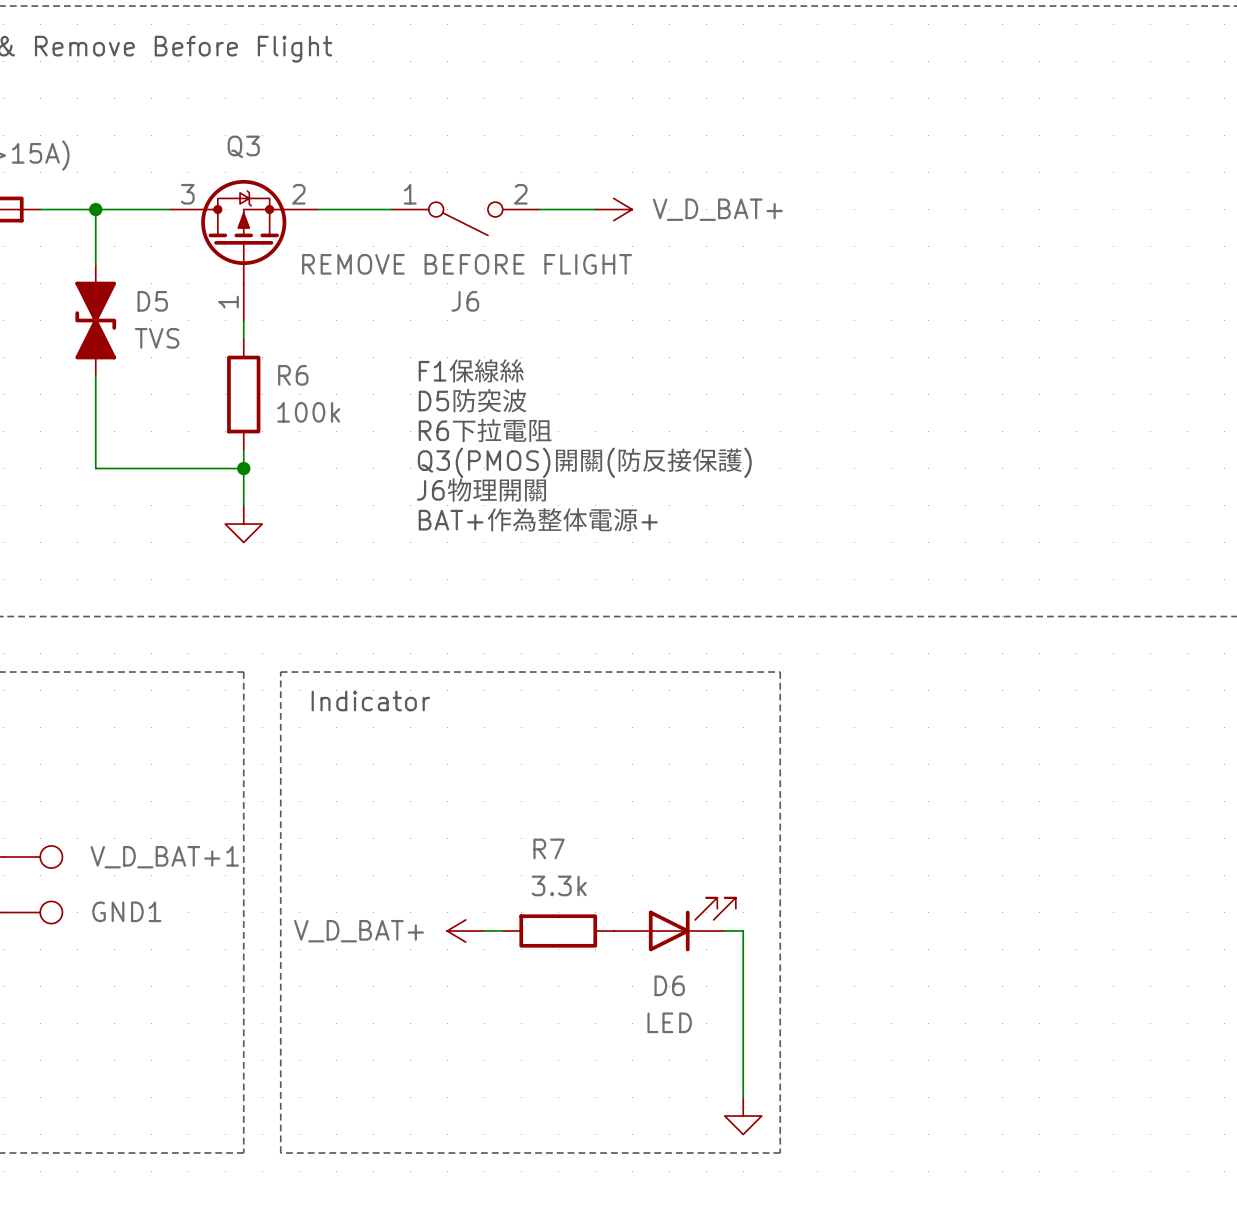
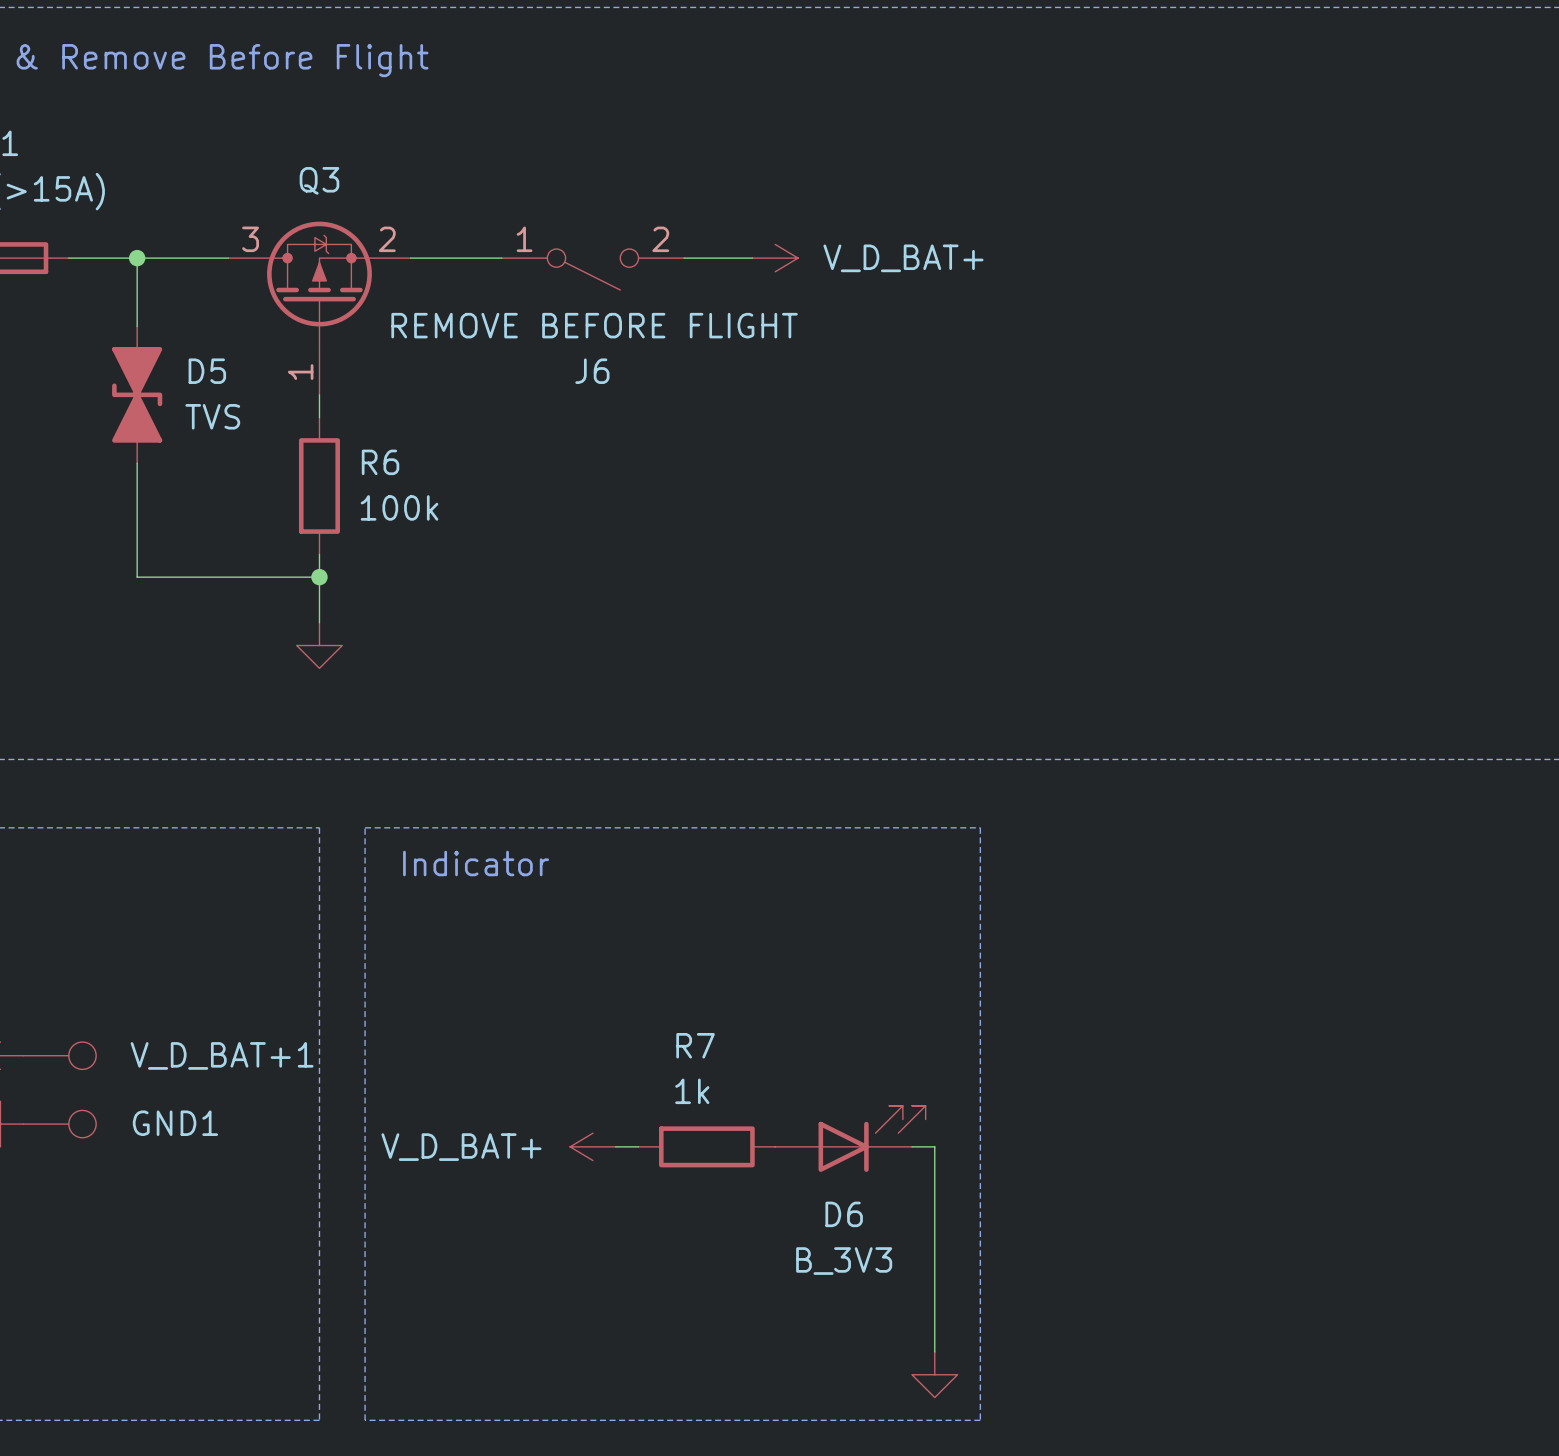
text: F1保線絲 (471, 370) -> none
text: D5防突波 (473, 400) -> none
text: R6下拉電阻 (485, 430) -> none
text: Q3(PMOS)開關(防反接保護) (584, 462) -> none
text: J6物理開關 (482, 490) -> none
text: BAT+作為整体電源+ (538, 519) -> none
R7 value: 3.3k (559, 885) -> 1k (692, 1091)
D6 value: LED (669, 1022) -> B_3V3 (844, 1261)

